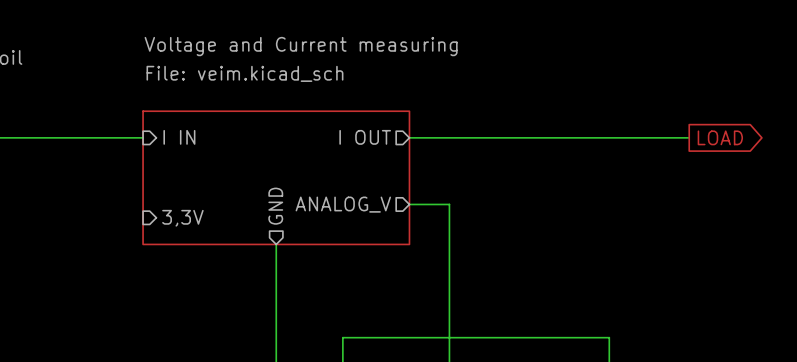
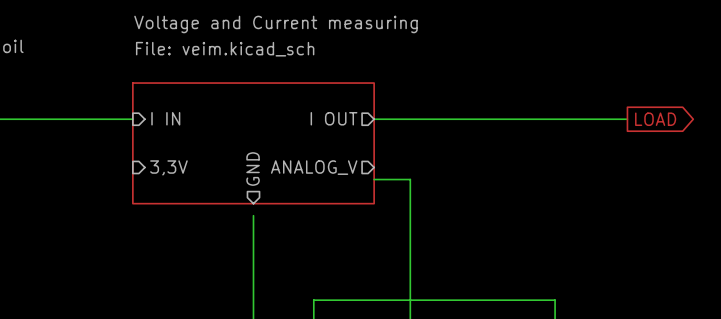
sheet Voltage and Current measuring position: (276, 177) -> (253, 143)
sheet pin position: ANALOG_V (343, 204) -> ANALOG_V (314, 167)
sheet pin position: GND (275, 206) -> GND (253, 169)
sheet pin position: 3,3V (182, 218) -> 3,3V (168, 167)

